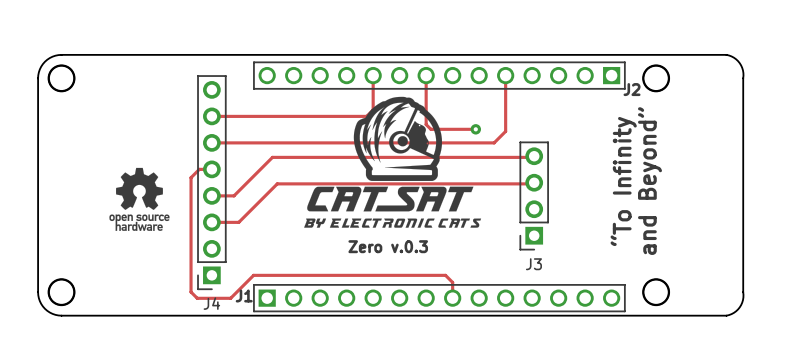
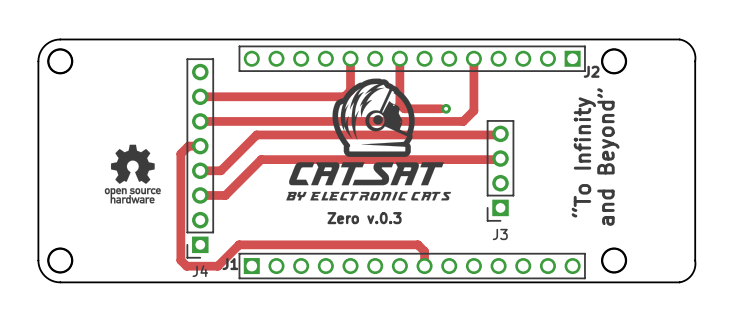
track width: thin (373, 75) (373, 109) (366, 116) (211, 116) -> thick (350, 58) (350, 90) (344, 96) (200, 96)
track width: thin (426, 75) (426, 124) (430, 129) (470, 129) -> thick (399, 58) (399, 104) (404, 108) (441, 108)
track width: thin (505, 75) (505, 131) (494, 142) (211, 142) -> thick (473, 58) (473, 110) (463, 121) (200, 121)
track width: thin (535, 157) (272, 157) (234, 195) (211, 195) -> thick (501, 134) (256, 134) (220, 170) (200, 170)
track width: thin (211, 169) (199, 169) (191, 177) (191, 292) (197, 298) (230, 298) (253, 275) (445, 275) (452, 282) (452, 298) -> thick (200, 146) (188, 146) (180, 153) (180, 260) (186, 266) (217, 266) (239, 244) (417, 244) (424, 251) (424, 266)
track width: thin (535, 183) (277, 183) (238, 222) (211, 222) -> thick (501, 159) (261, 159) (225, 195) (200, 195)

